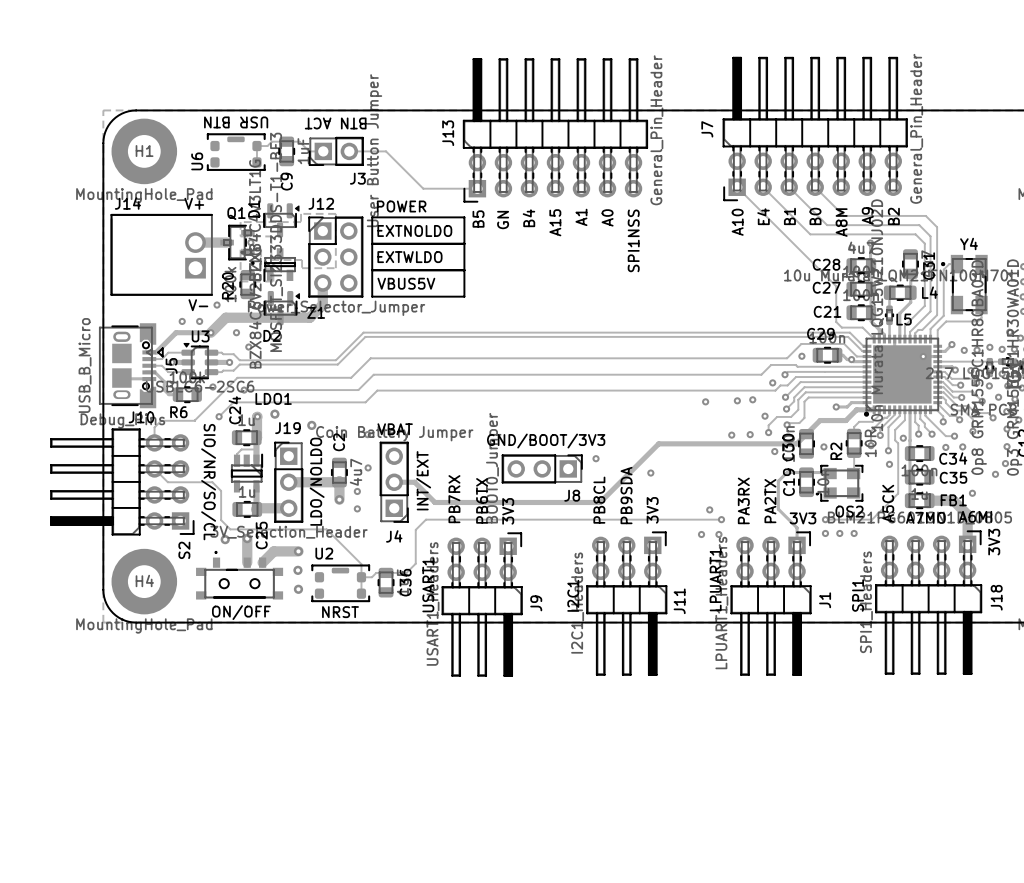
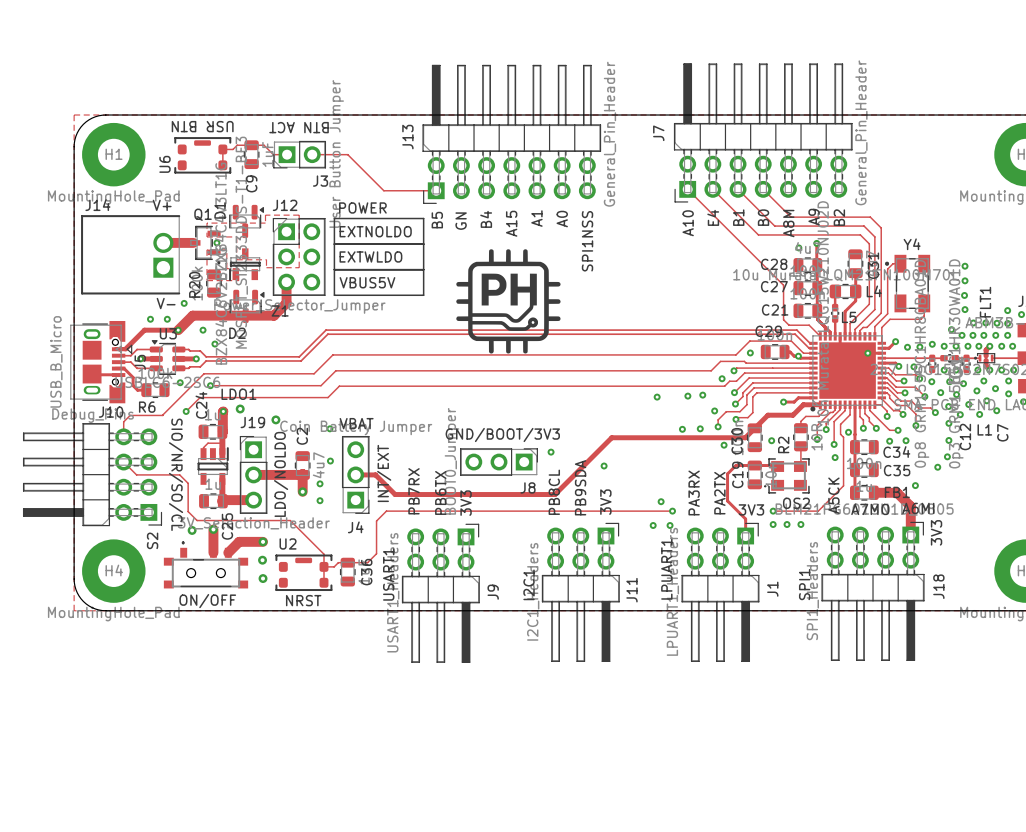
drawing: none -> [456, 249, 561, 354]

